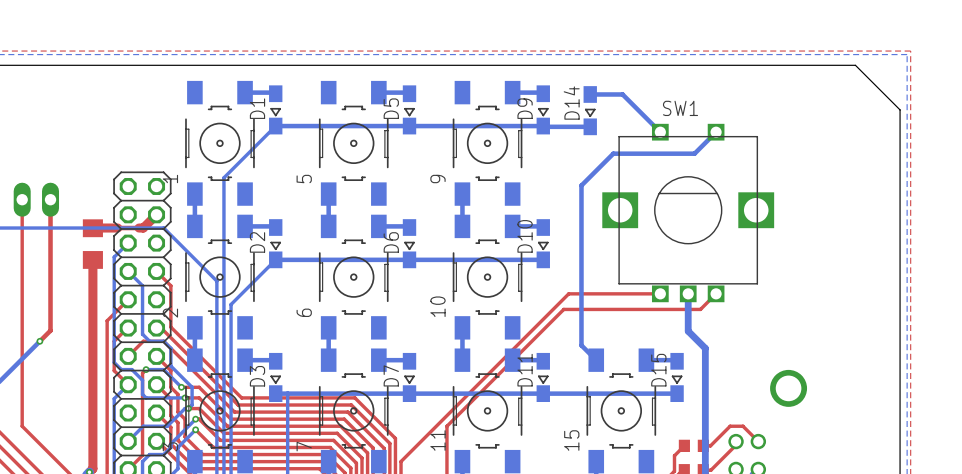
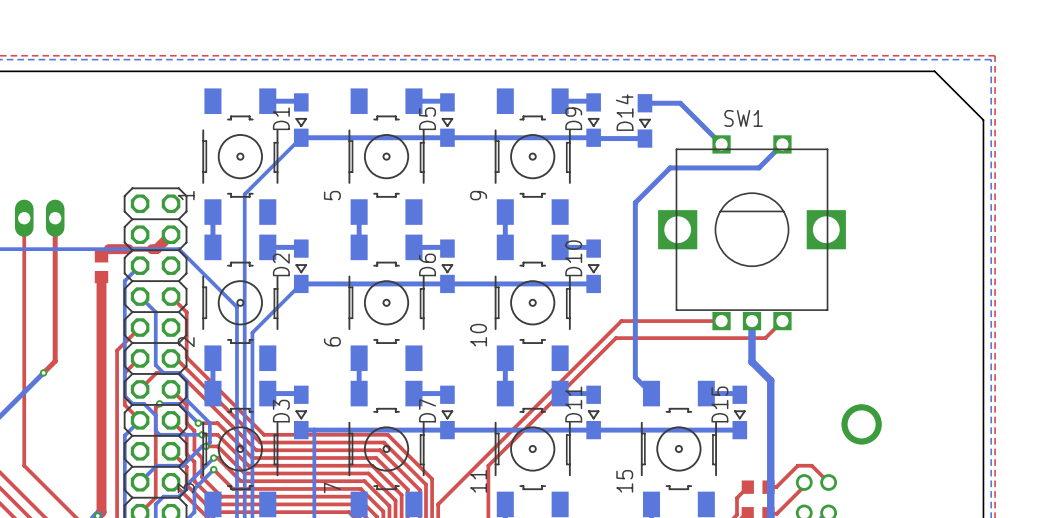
part footprint: [82, 219, 103, 269] -> [94, 250, 109, 284]

